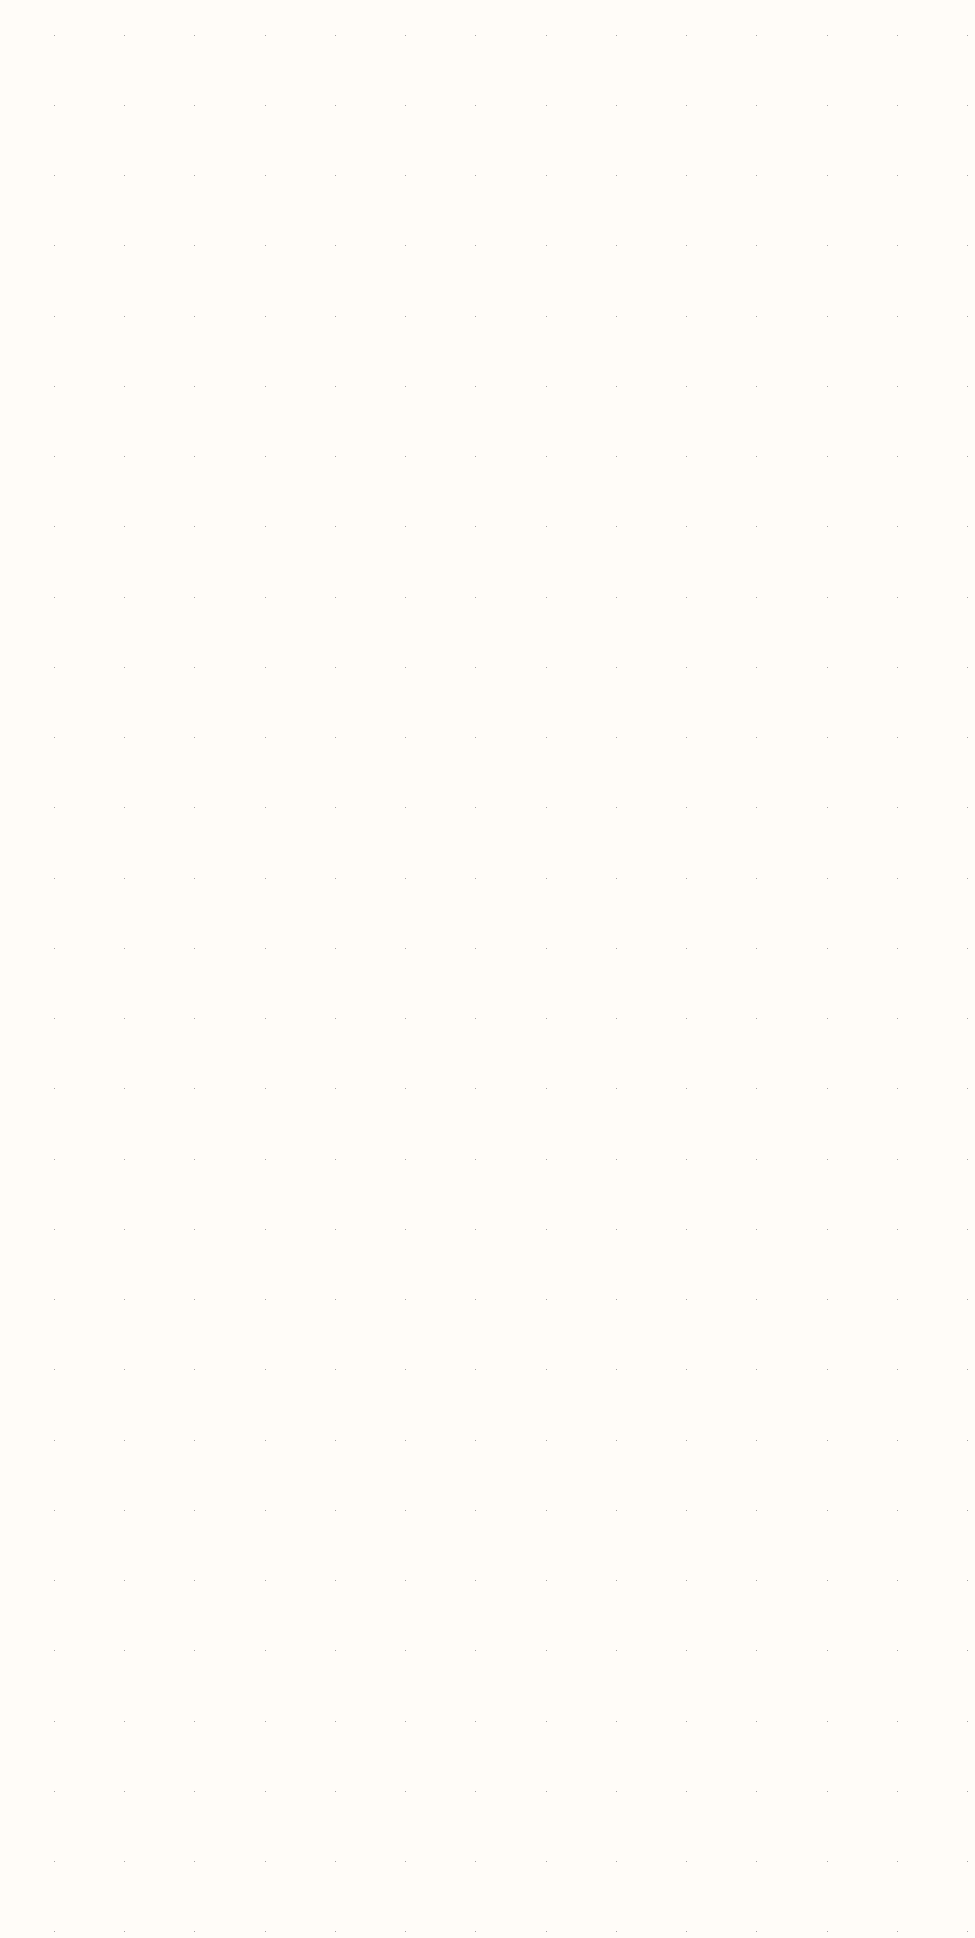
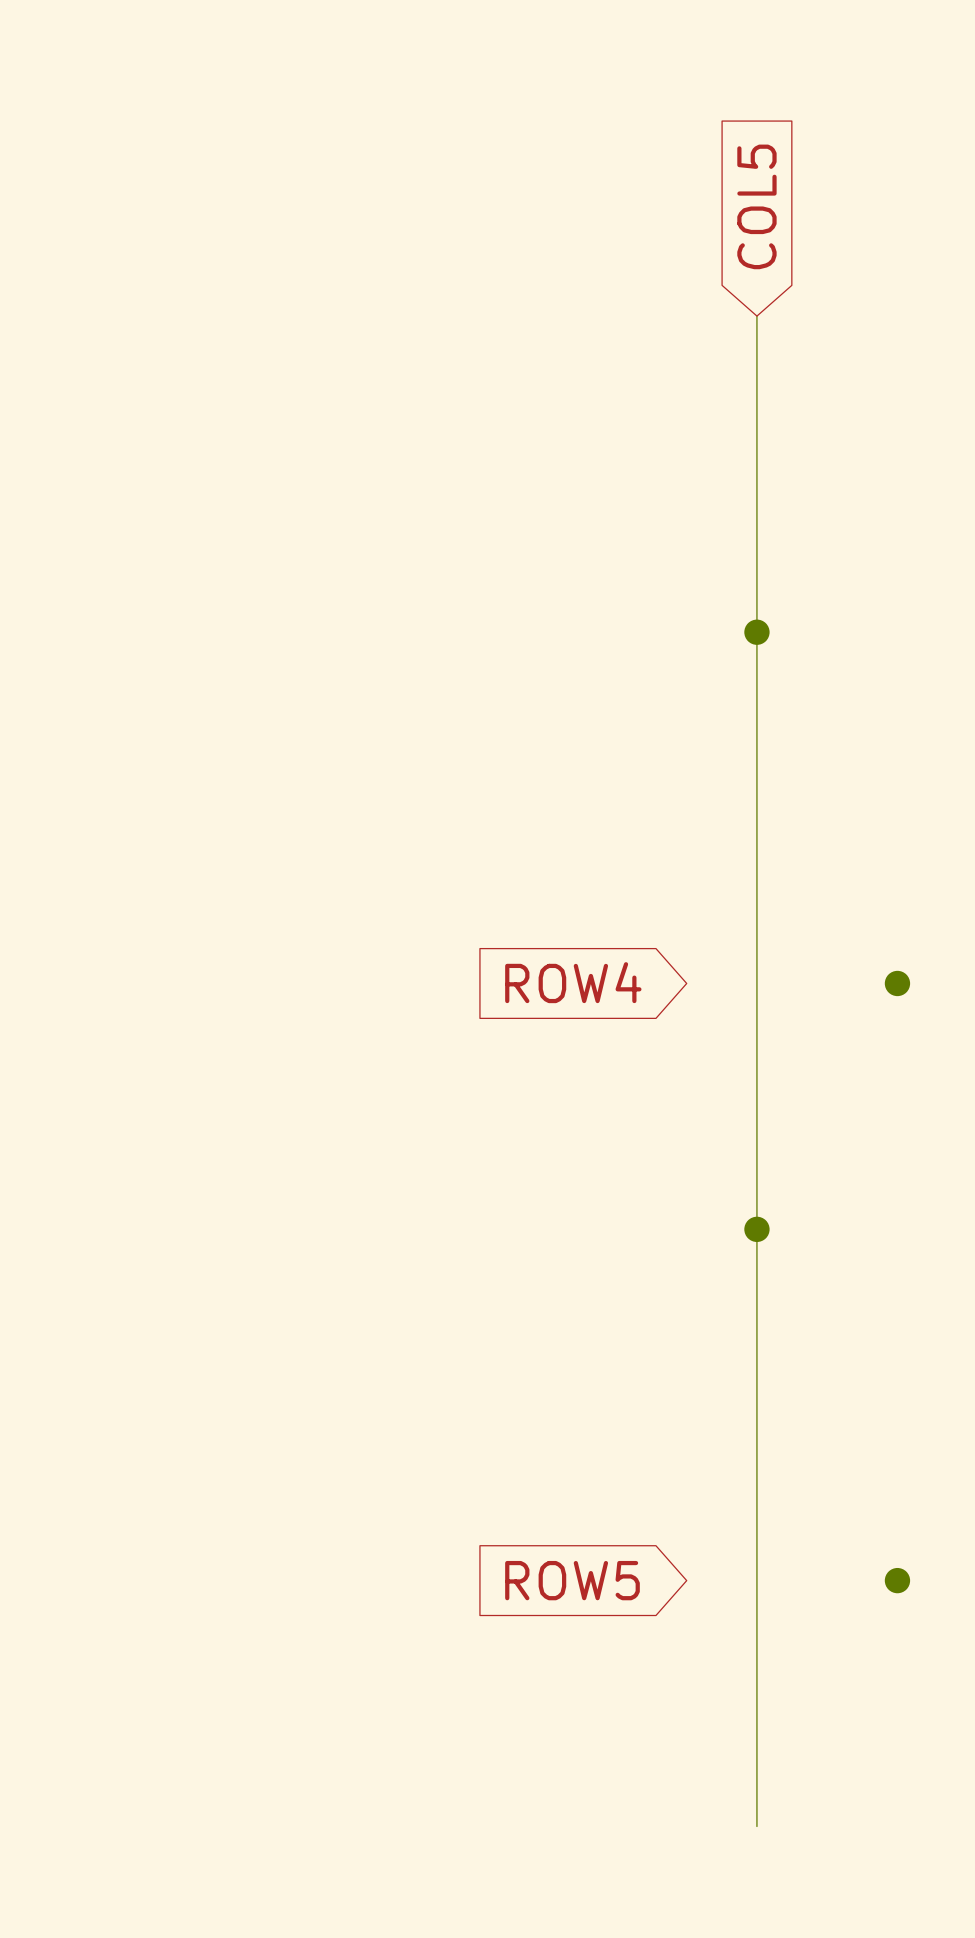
global label: none -> COL5 (756, 206)
wire: none -> (756, 316) (756, 1826)
junction: none -> (756, 632)
global label: none -> ROW4 (573, 982)
junction: none -> (897, 983)
junction: none -> (756, 1229)
global label: none -> ROW5 (572, 1580)
junction: none -> (897, 1580)

